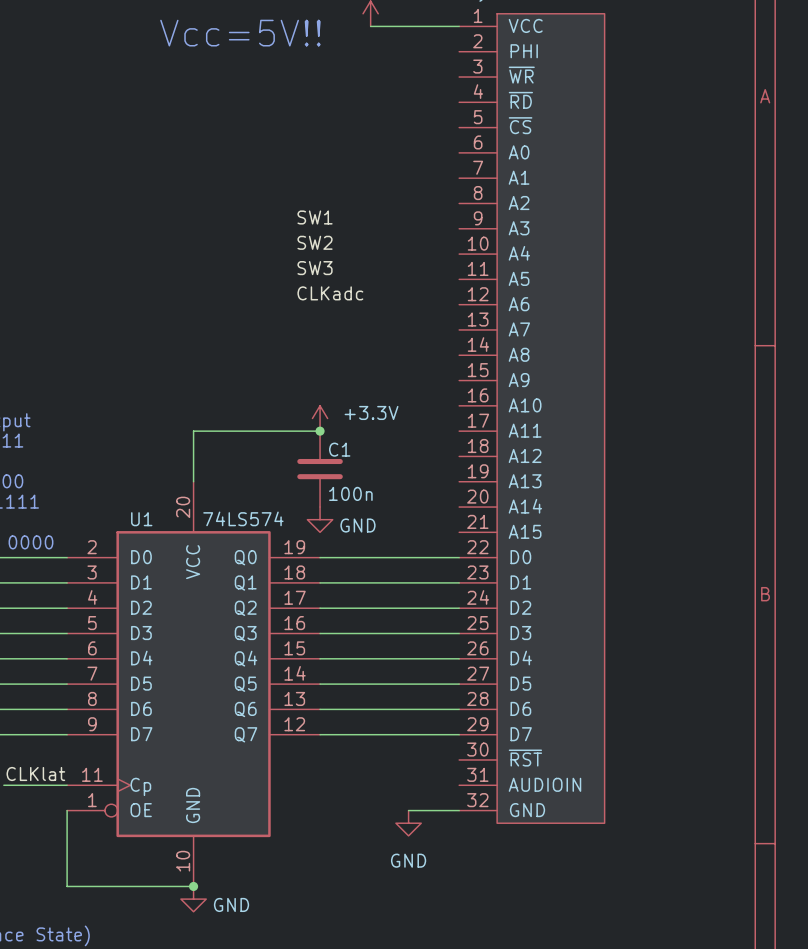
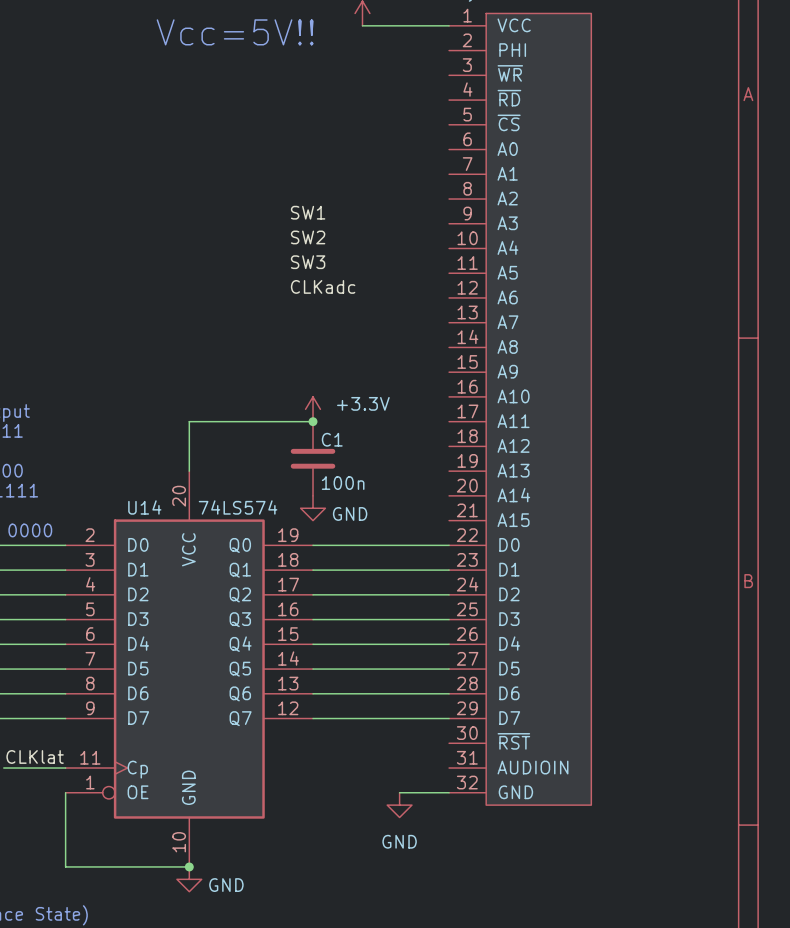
U1 name: U1 (141, 519) -> U14 (144, 507)

